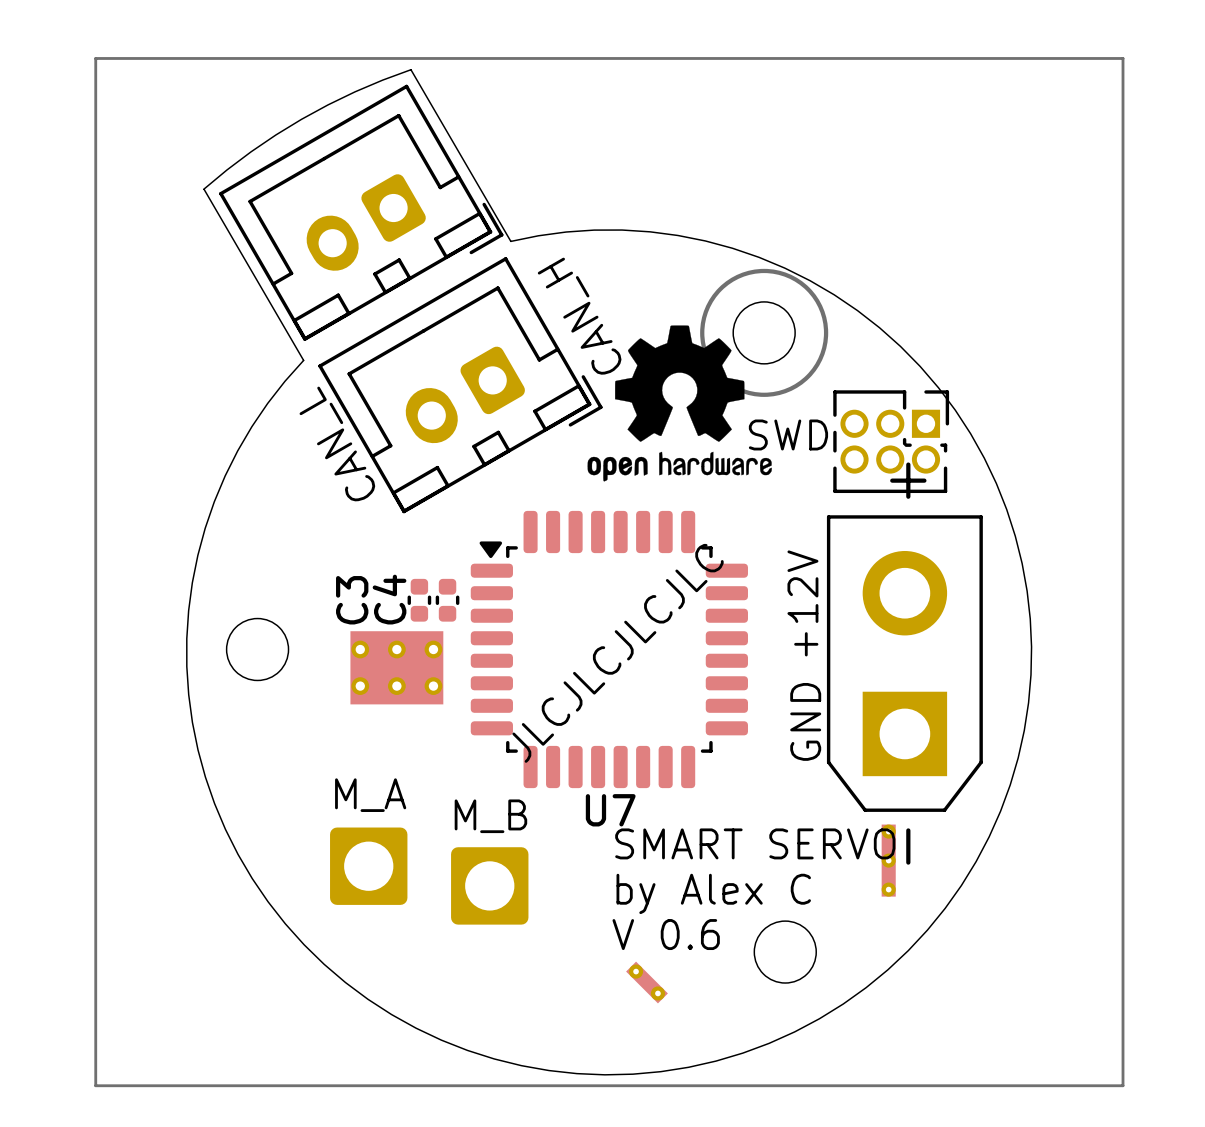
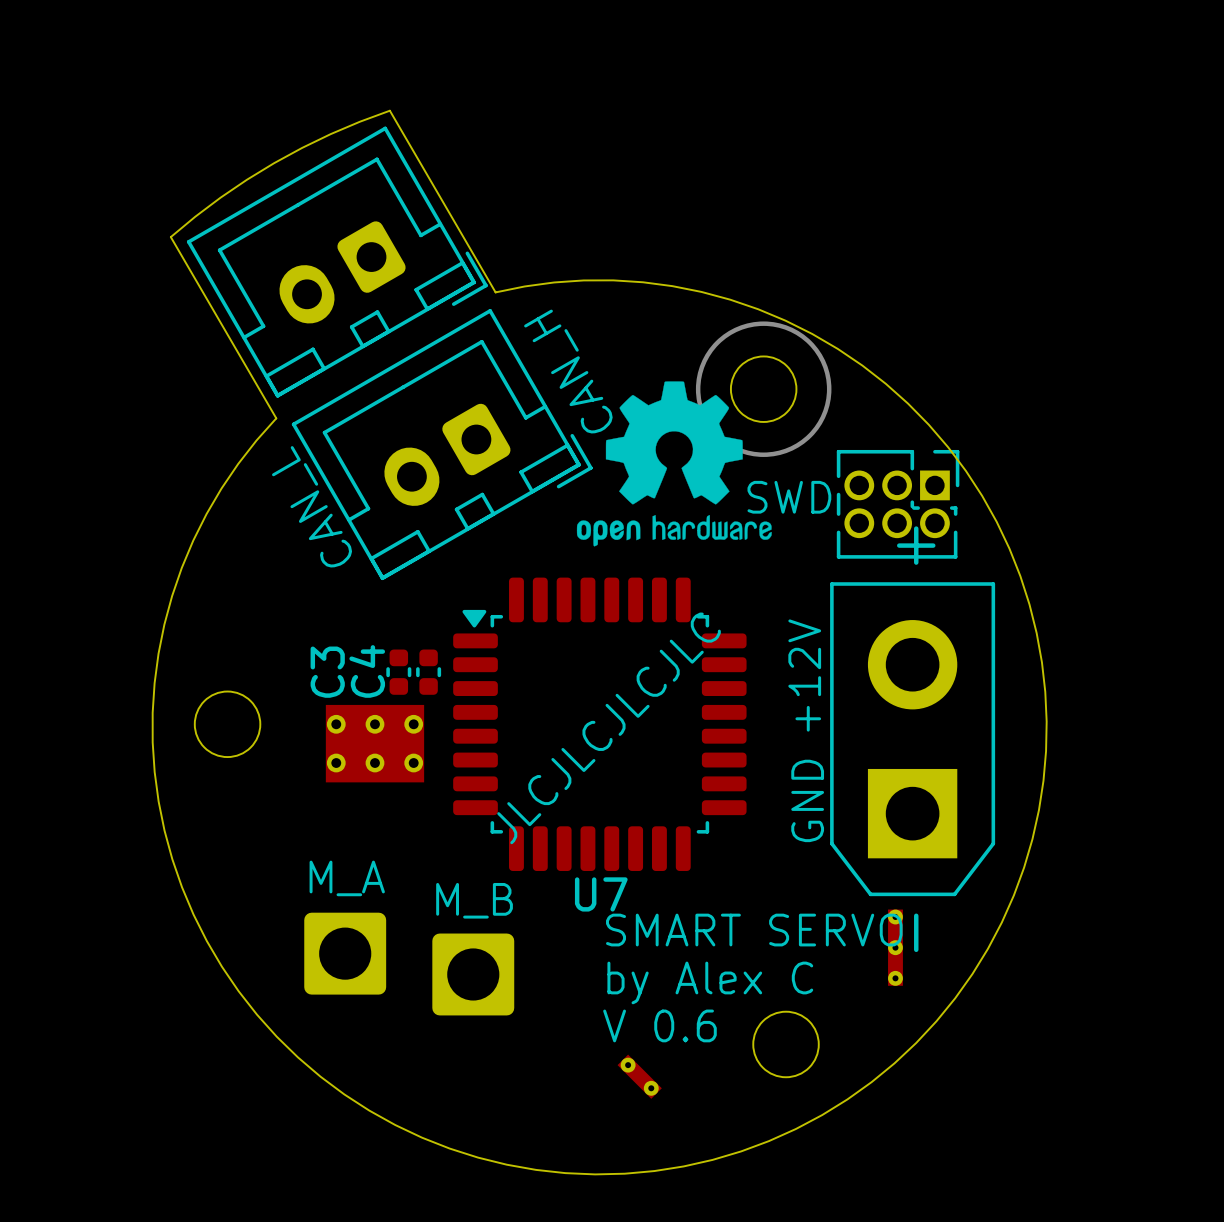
line: (95, 58) (1123, 58) (1123, 1085) (95, 1085) (95, 58) -> none

